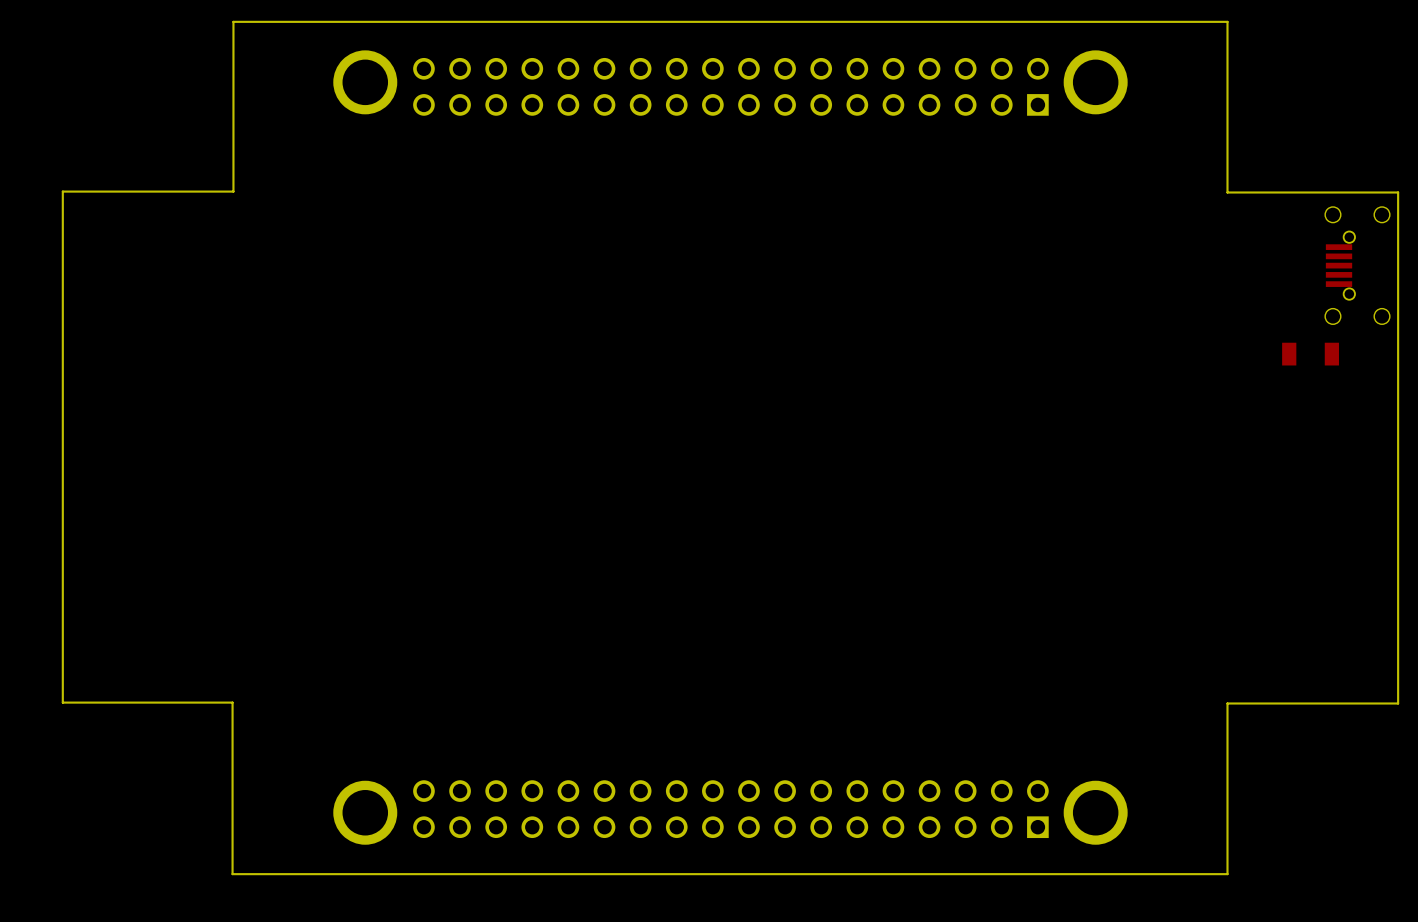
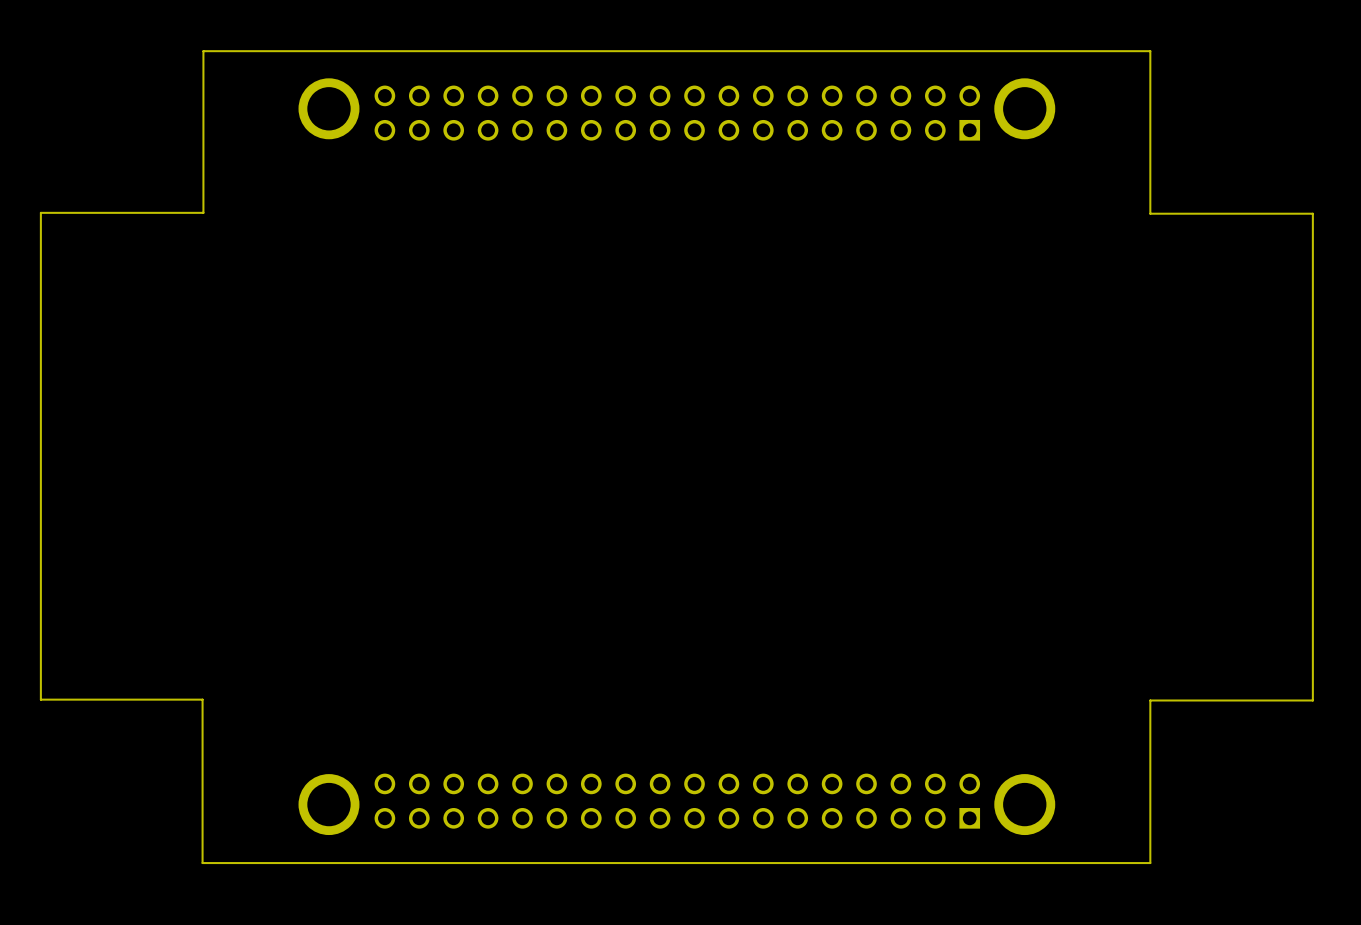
part: (1357, 265) -> none
part: (1310, 354) -> none

